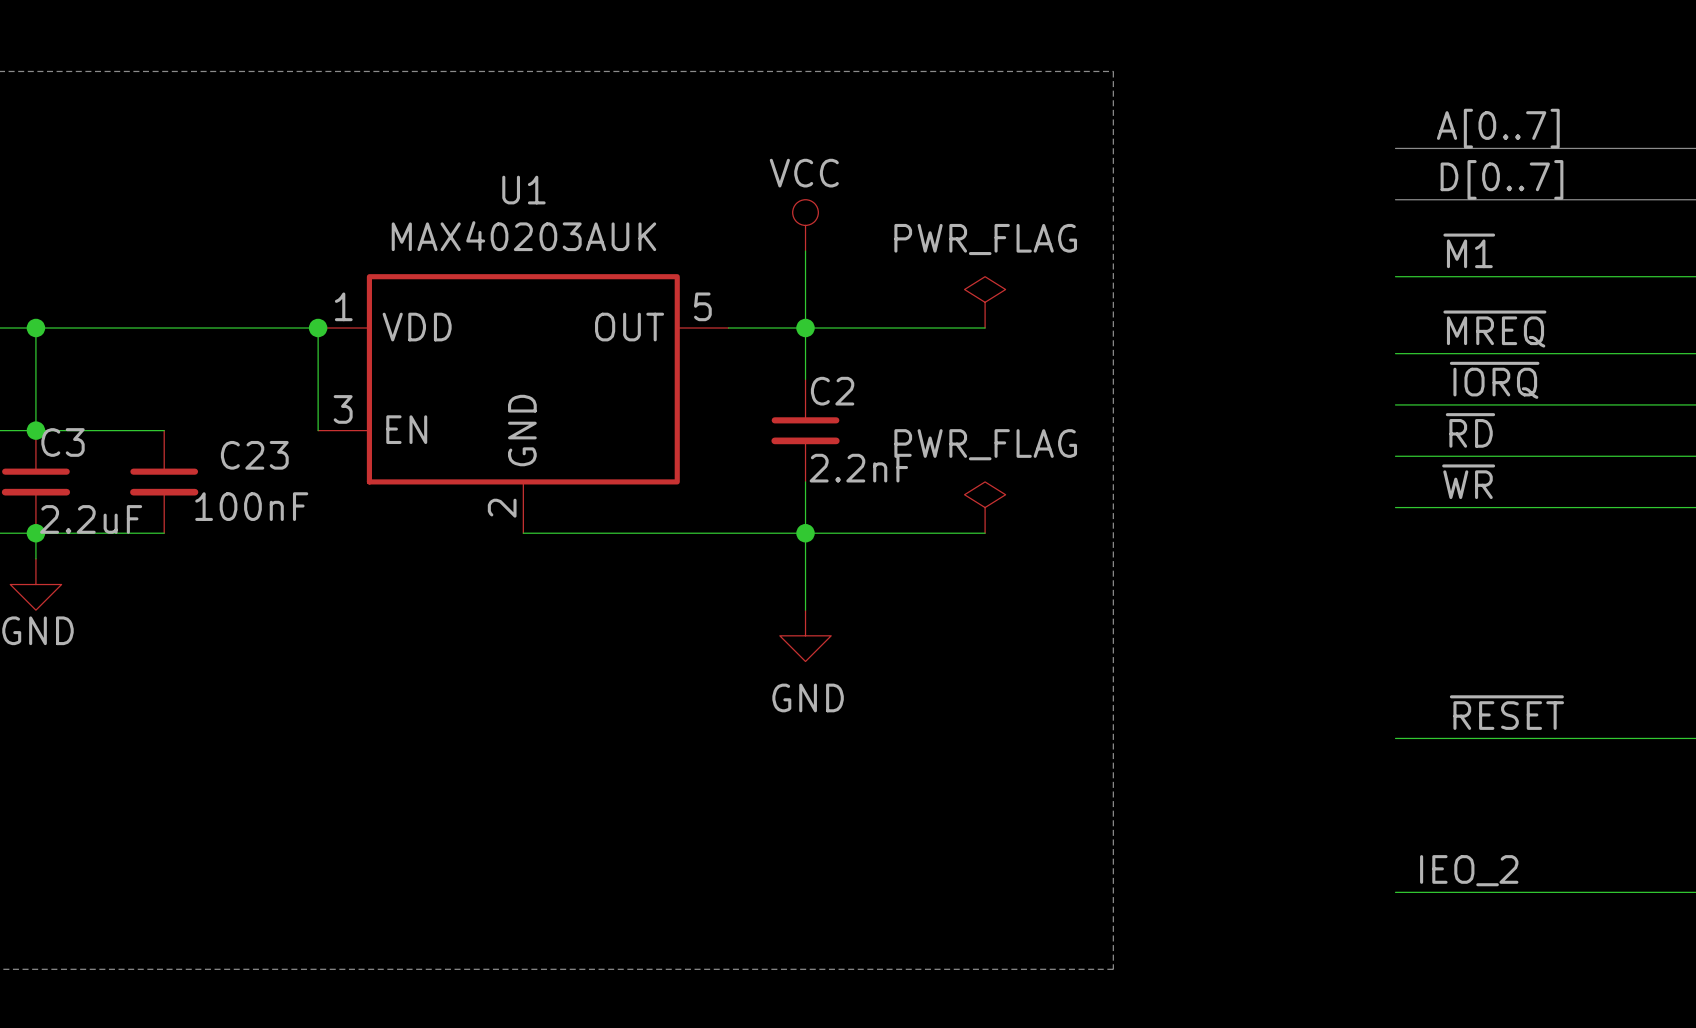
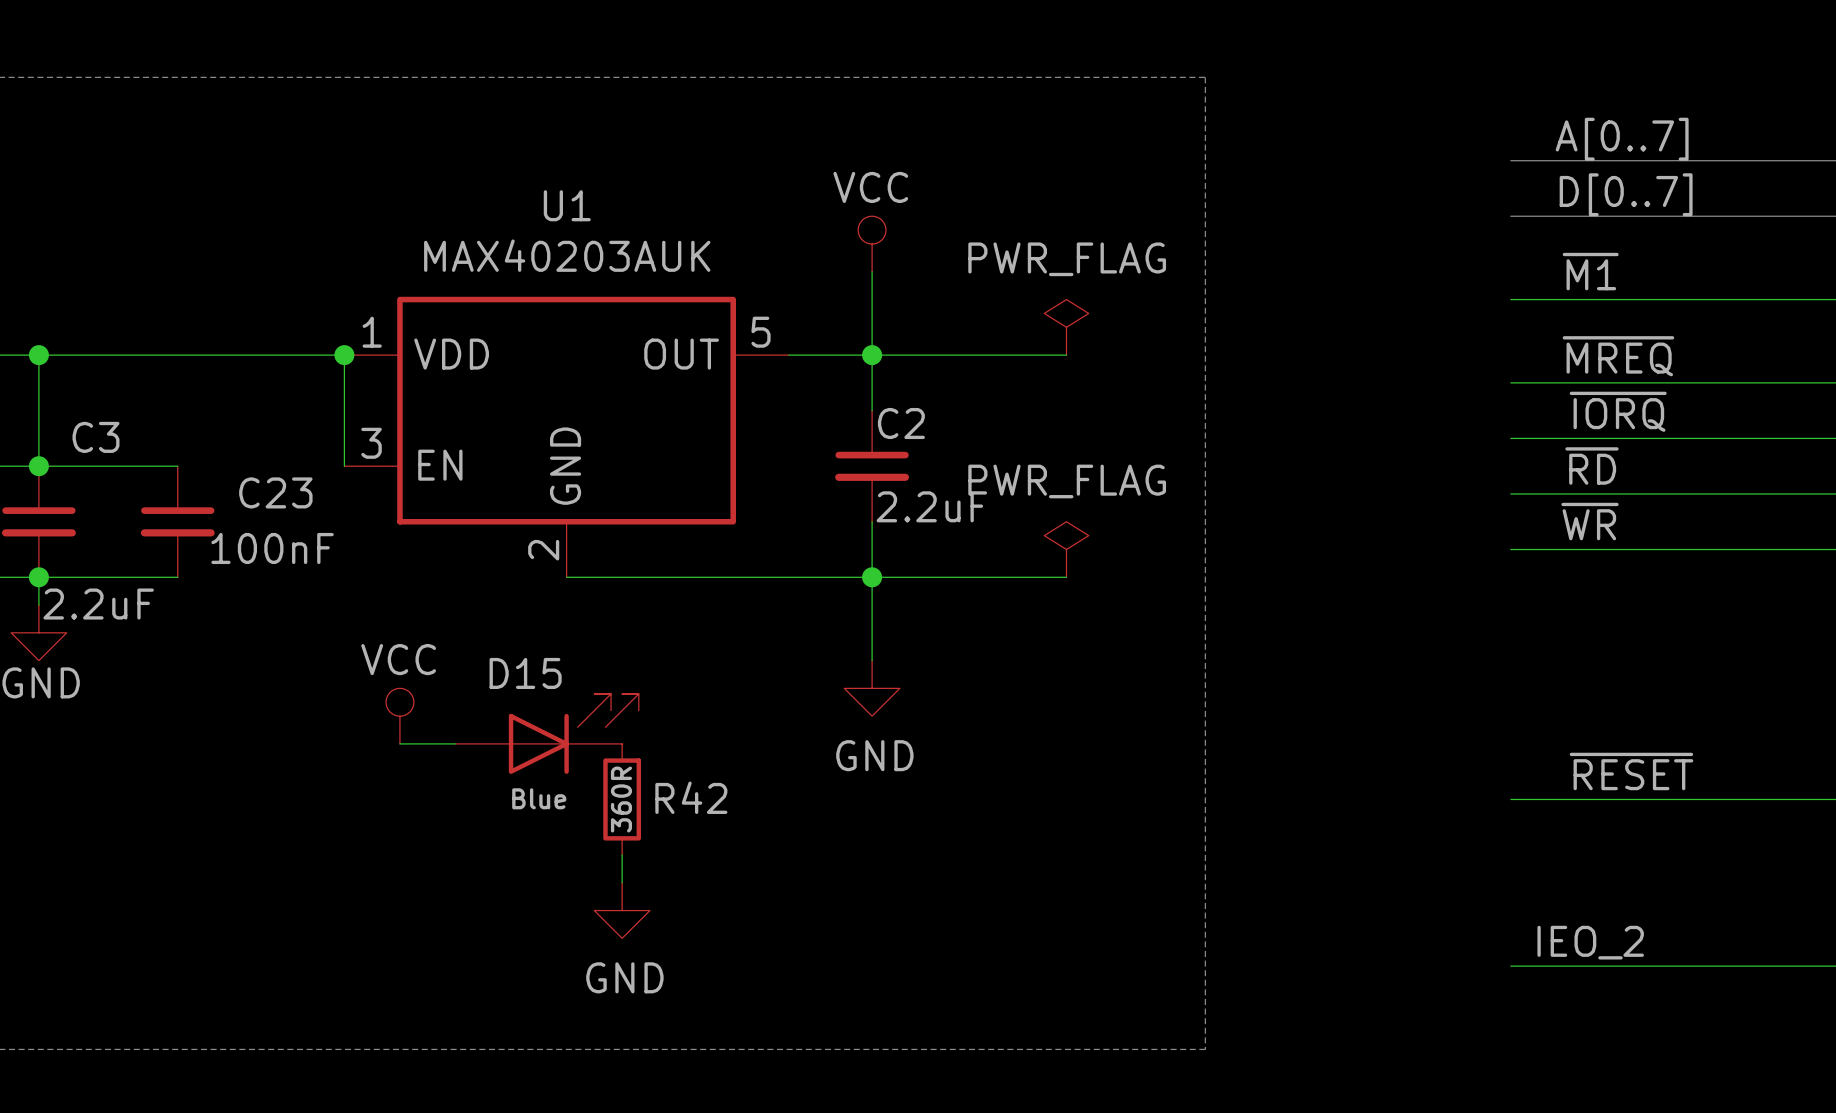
C3 name position: C3 (63, 442) -> C3 (95, 437)
C2 value: 2.2nF (860, 468) -> 2.2uF (931, 506)
C3 value position: 2.2uF (91, 519) -> 2.2uF (98, 604)
power symbol: none -> VCC (399, 716)
D15: none -> Blue (547, 733)
wire: none -> (399, 743) (455, 743)
R42: none -> 360R (622, 799)
wire: none -> (622, 855) (622, 882)
power symbol: none -> GND (622, 910)

